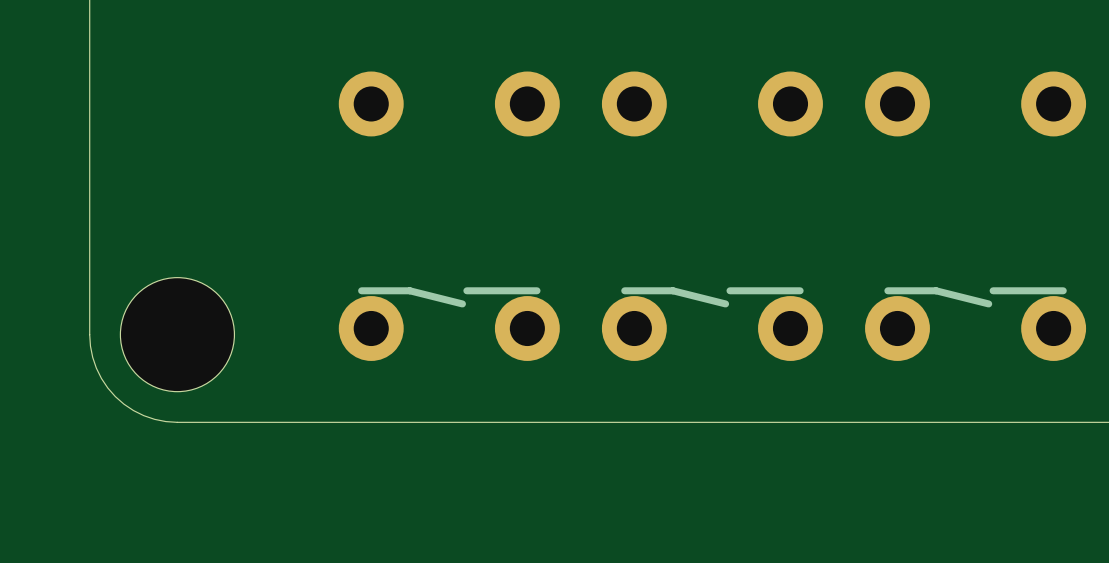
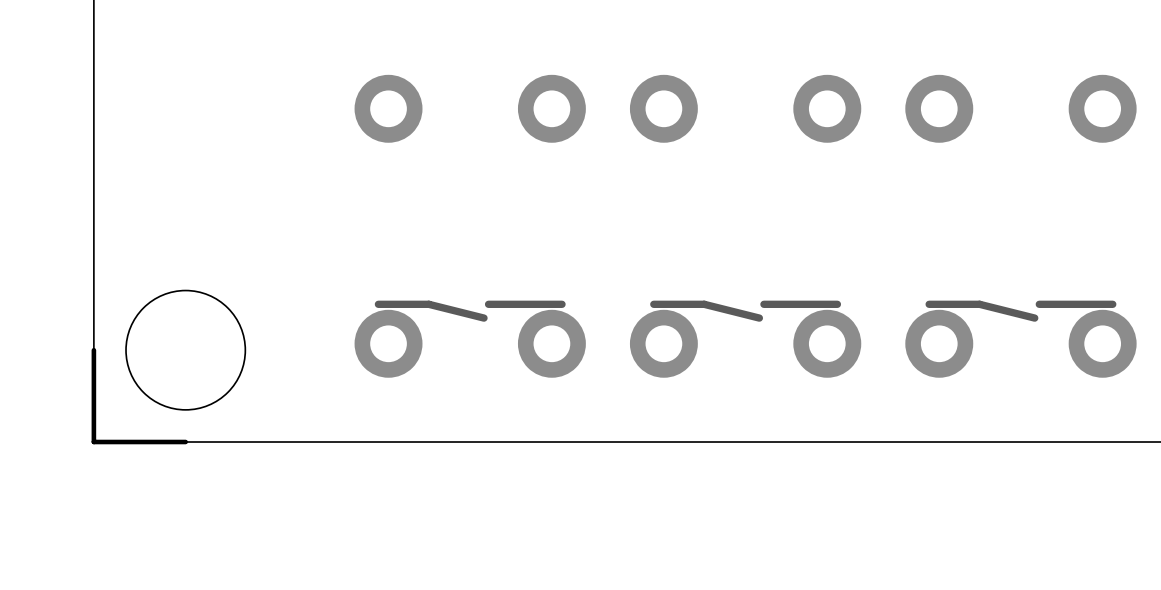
board edge: (89, 334) (96, 368) (115, 396) (143, 415) (177, 422) -> (93, 350) (93, 442) (185, 442)

